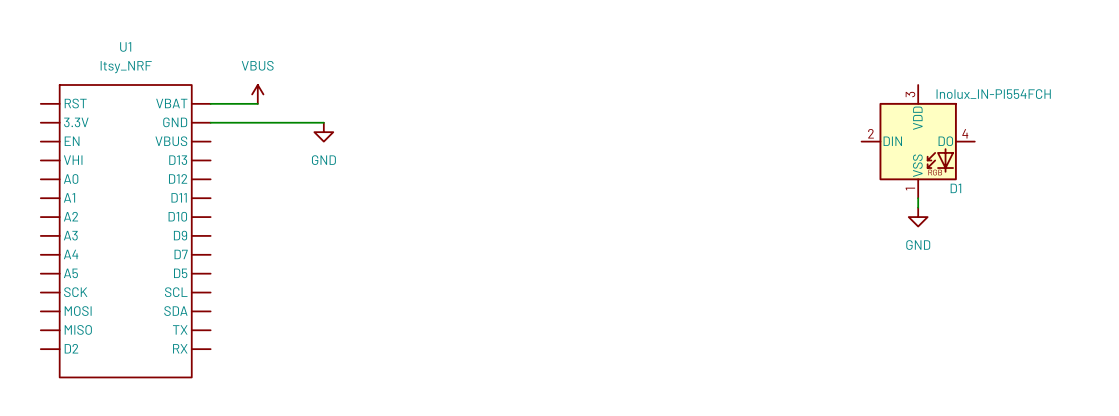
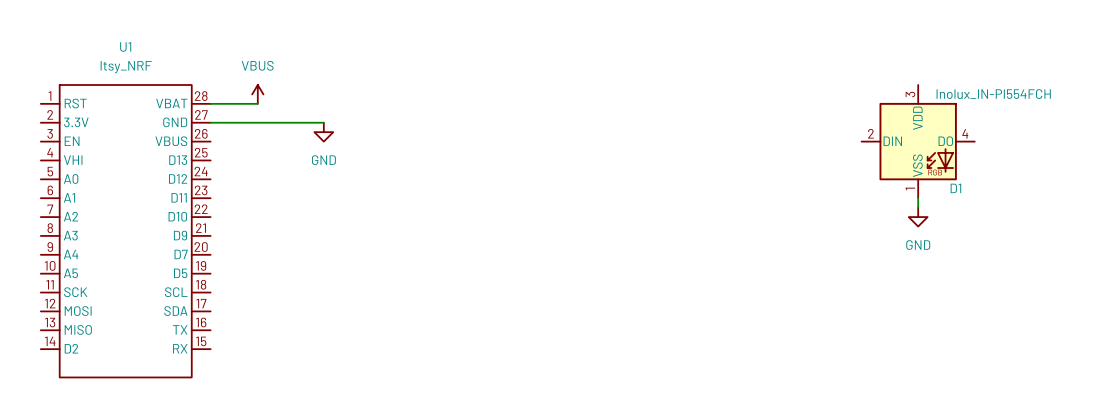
U1 symbol: [40, 84, 211, 378] -> [40, 84, 211, 378]

